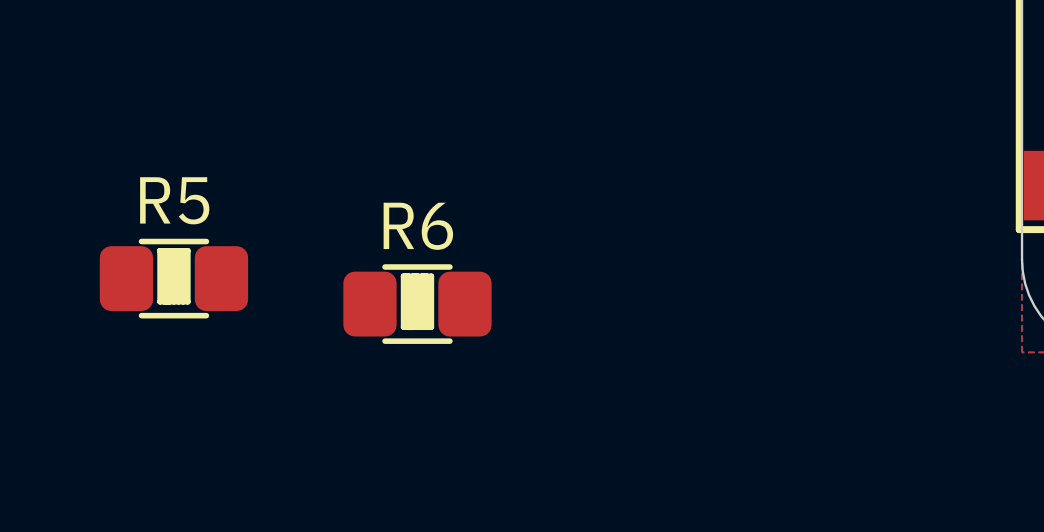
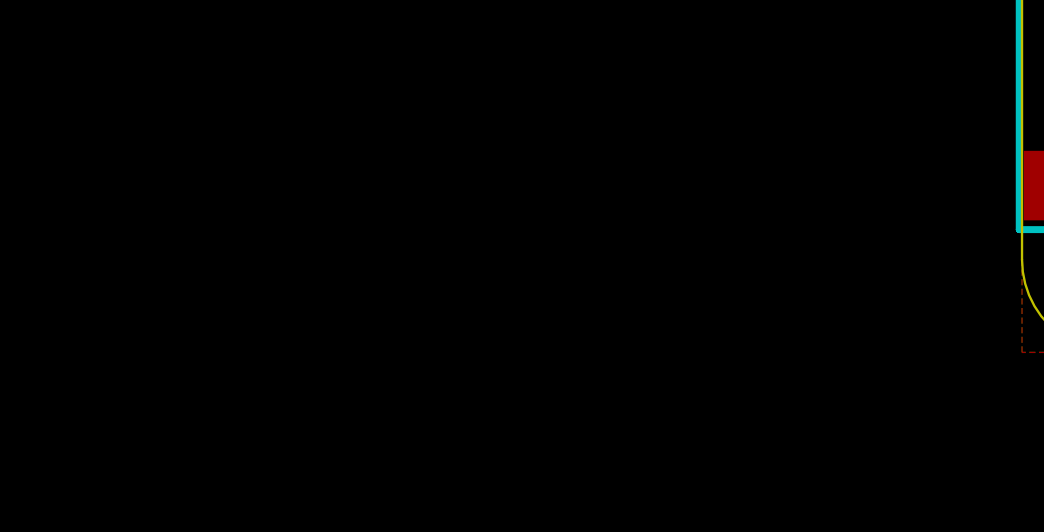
R5: (173, 278) -> none
R6: (417, 304) -> none

